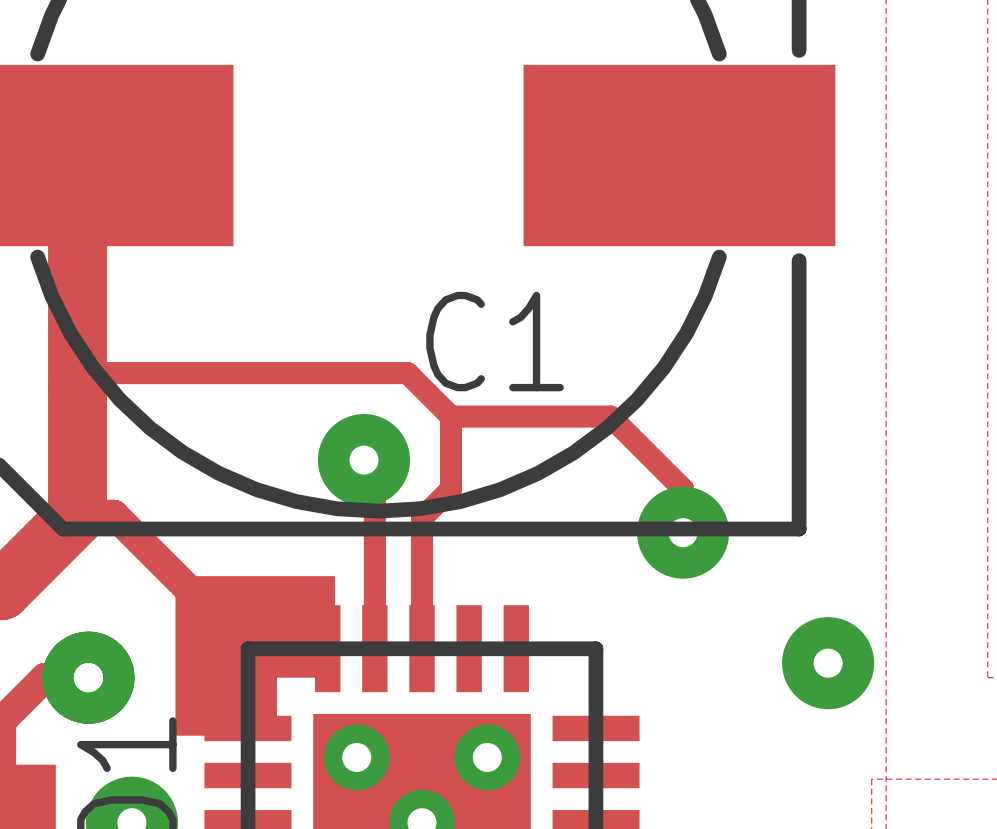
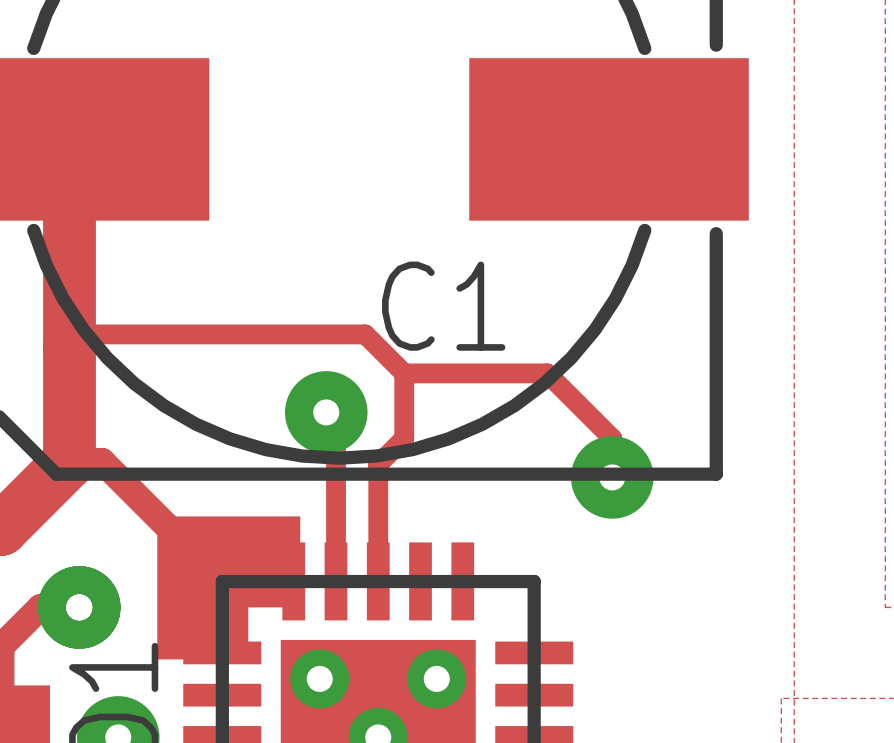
via: (828, 663) -> none

